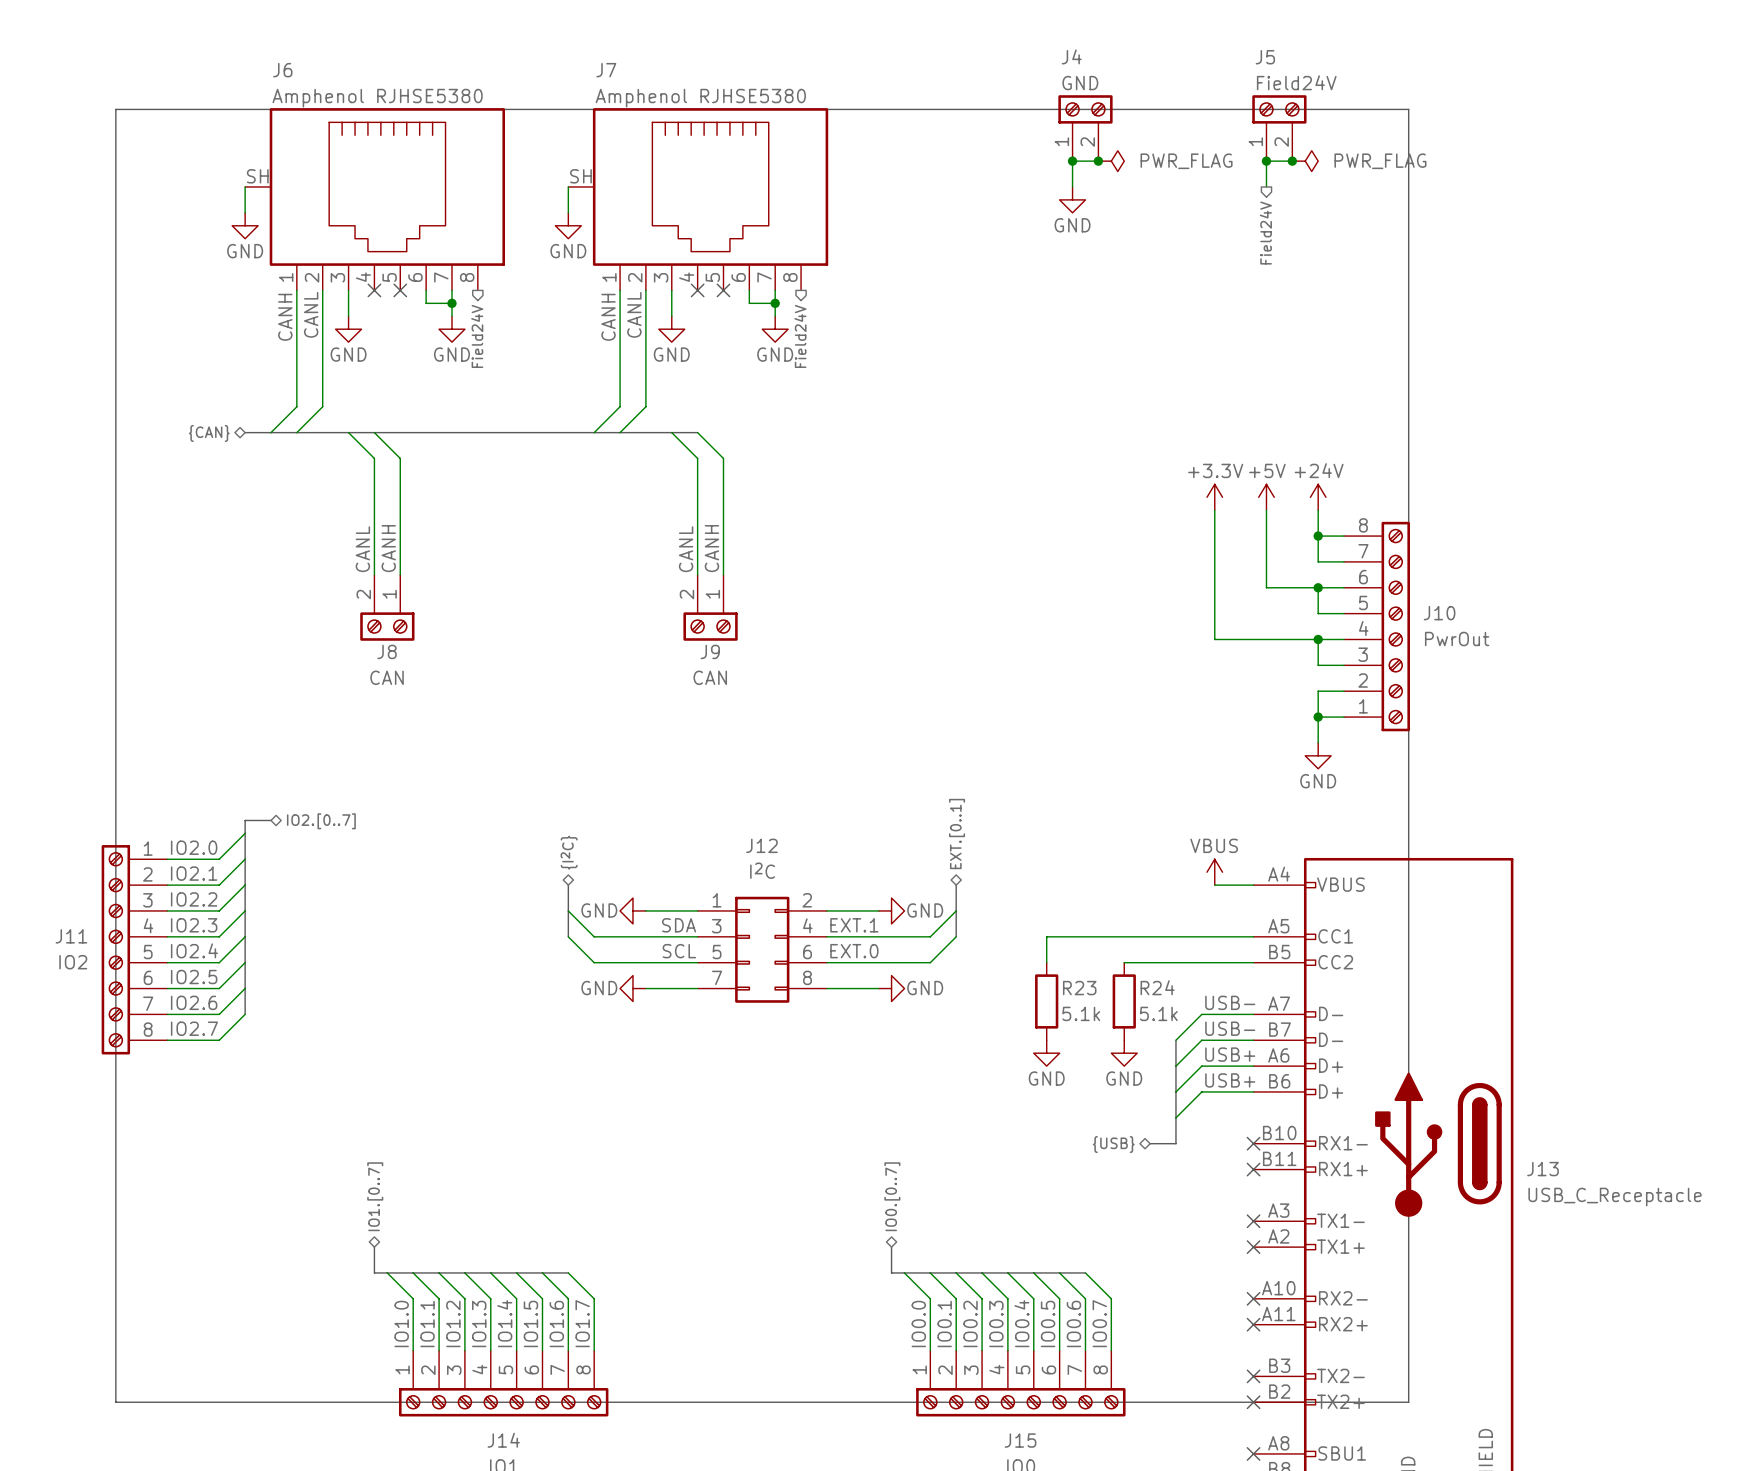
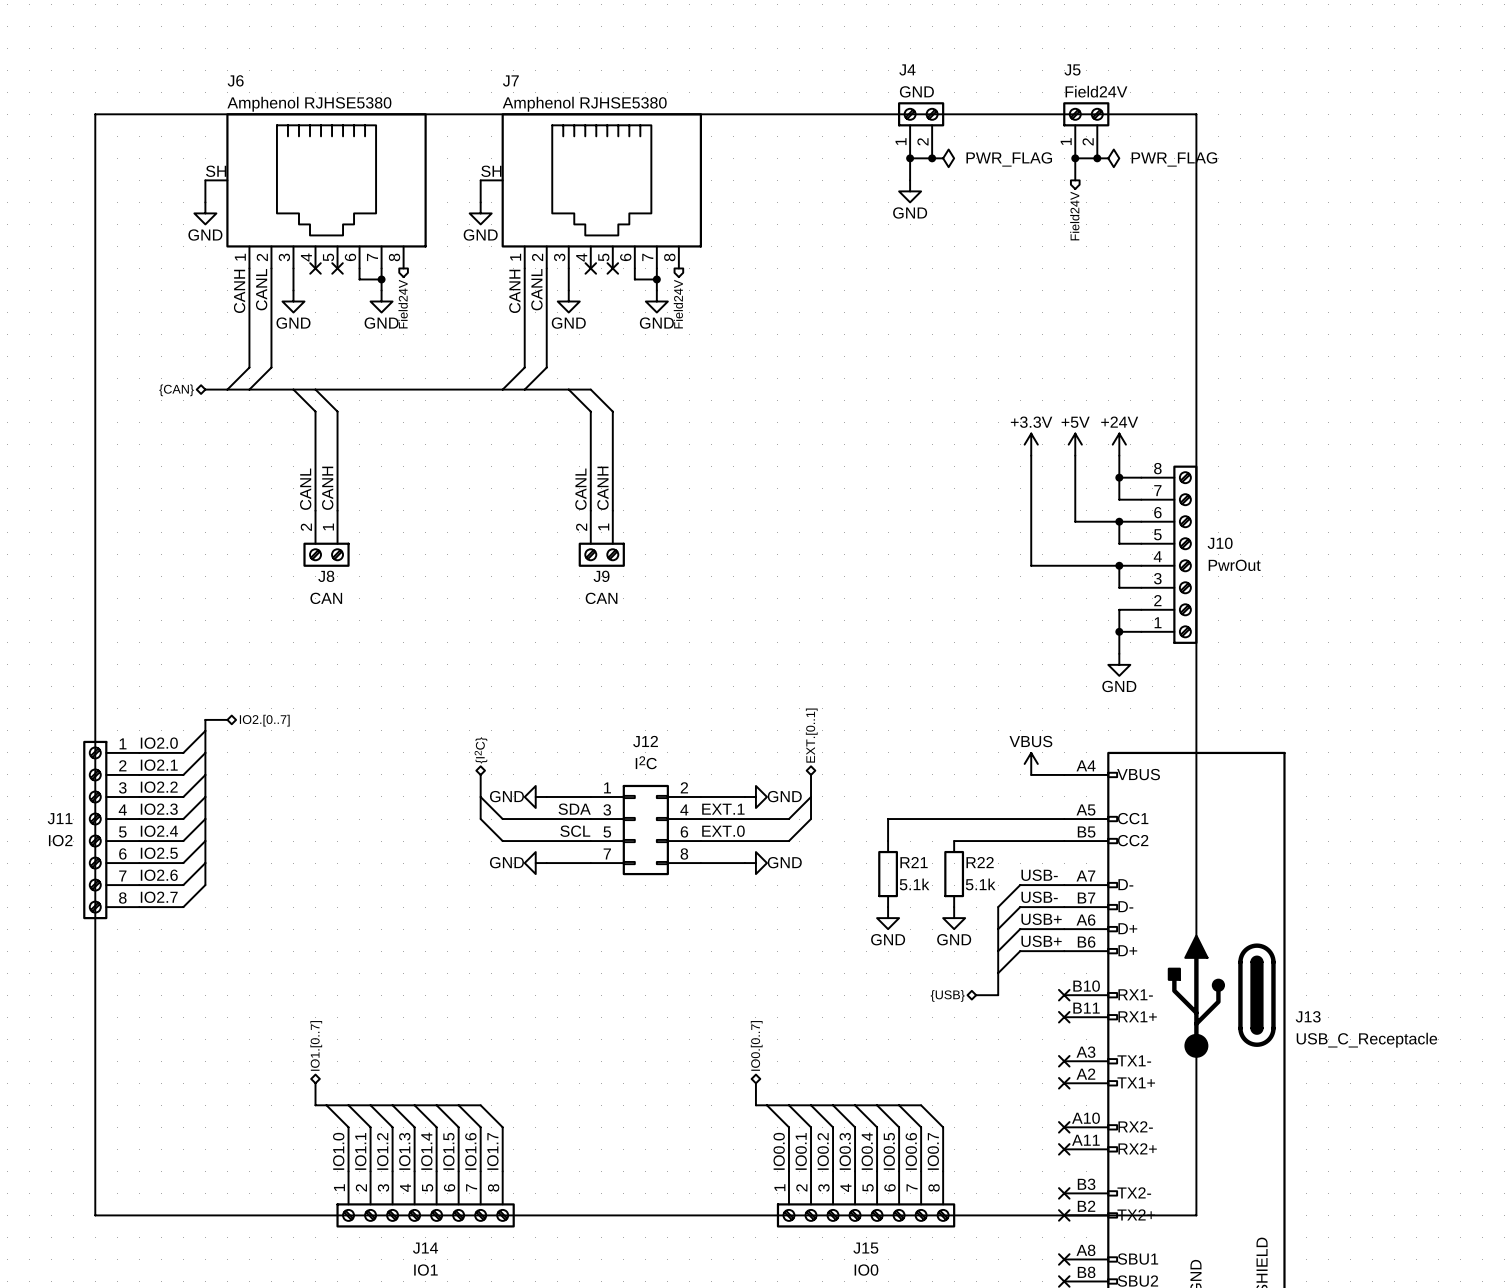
R24 name: R24 (1157, 987) -> R22 (980, 862)
R23 name: R23 (1079, 988) -> R21 (914, 862)

